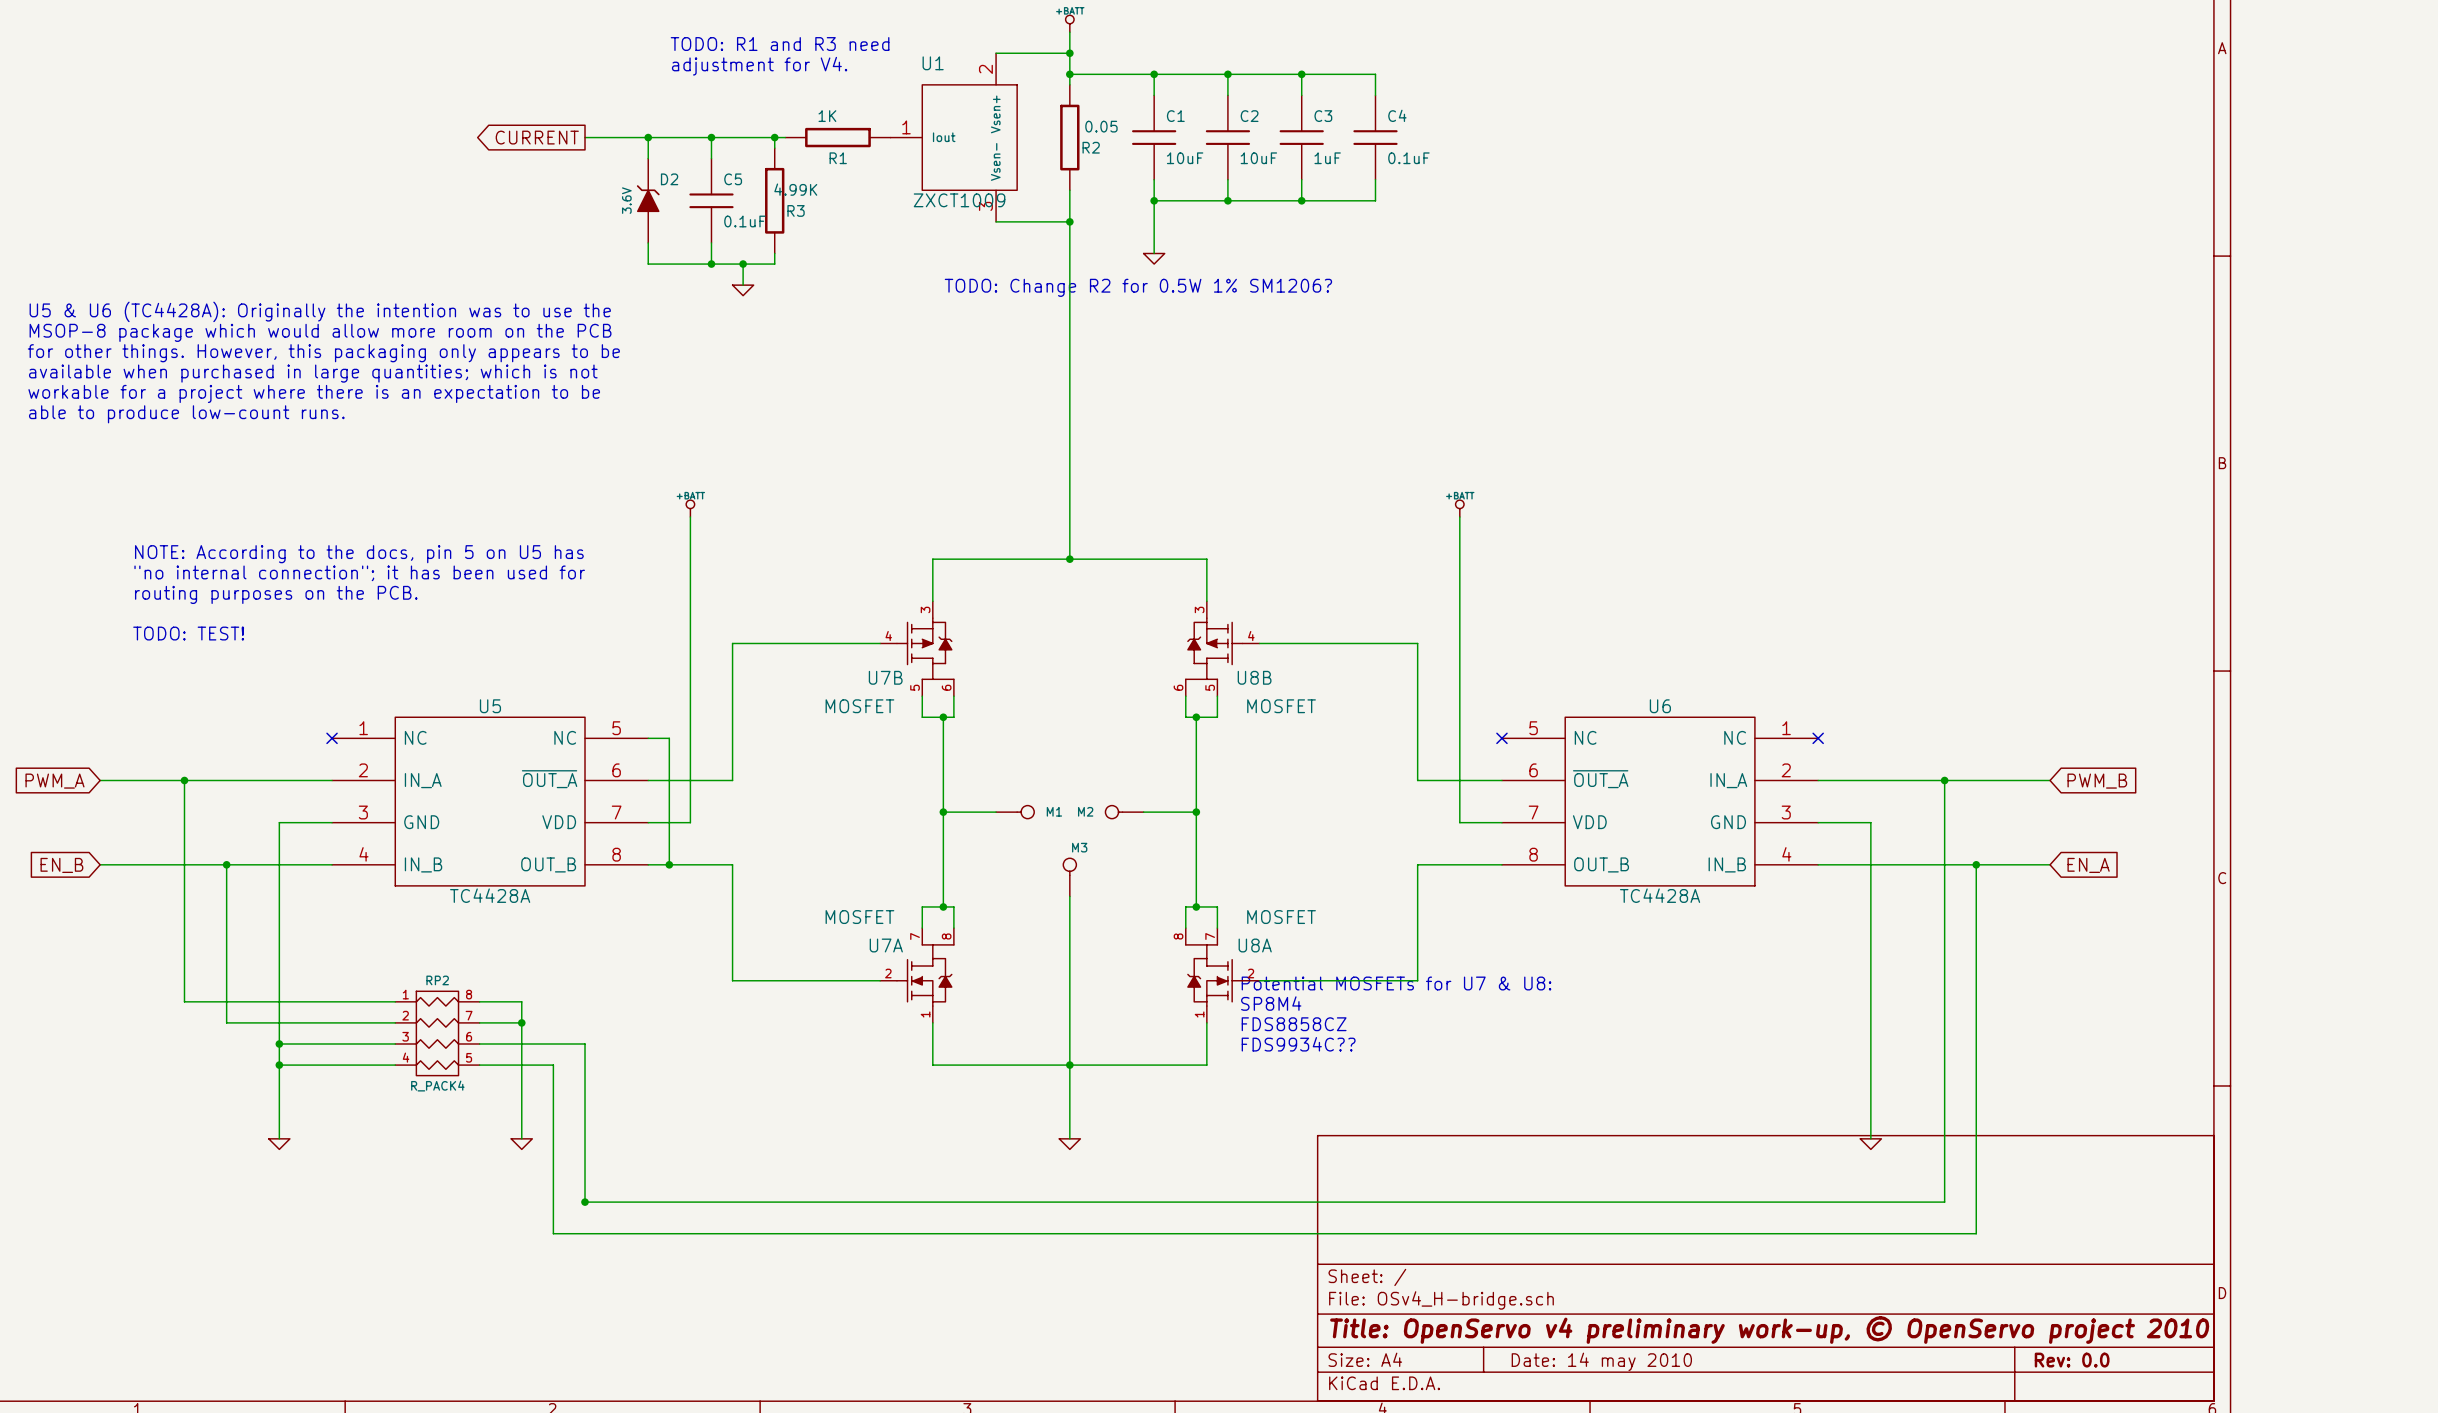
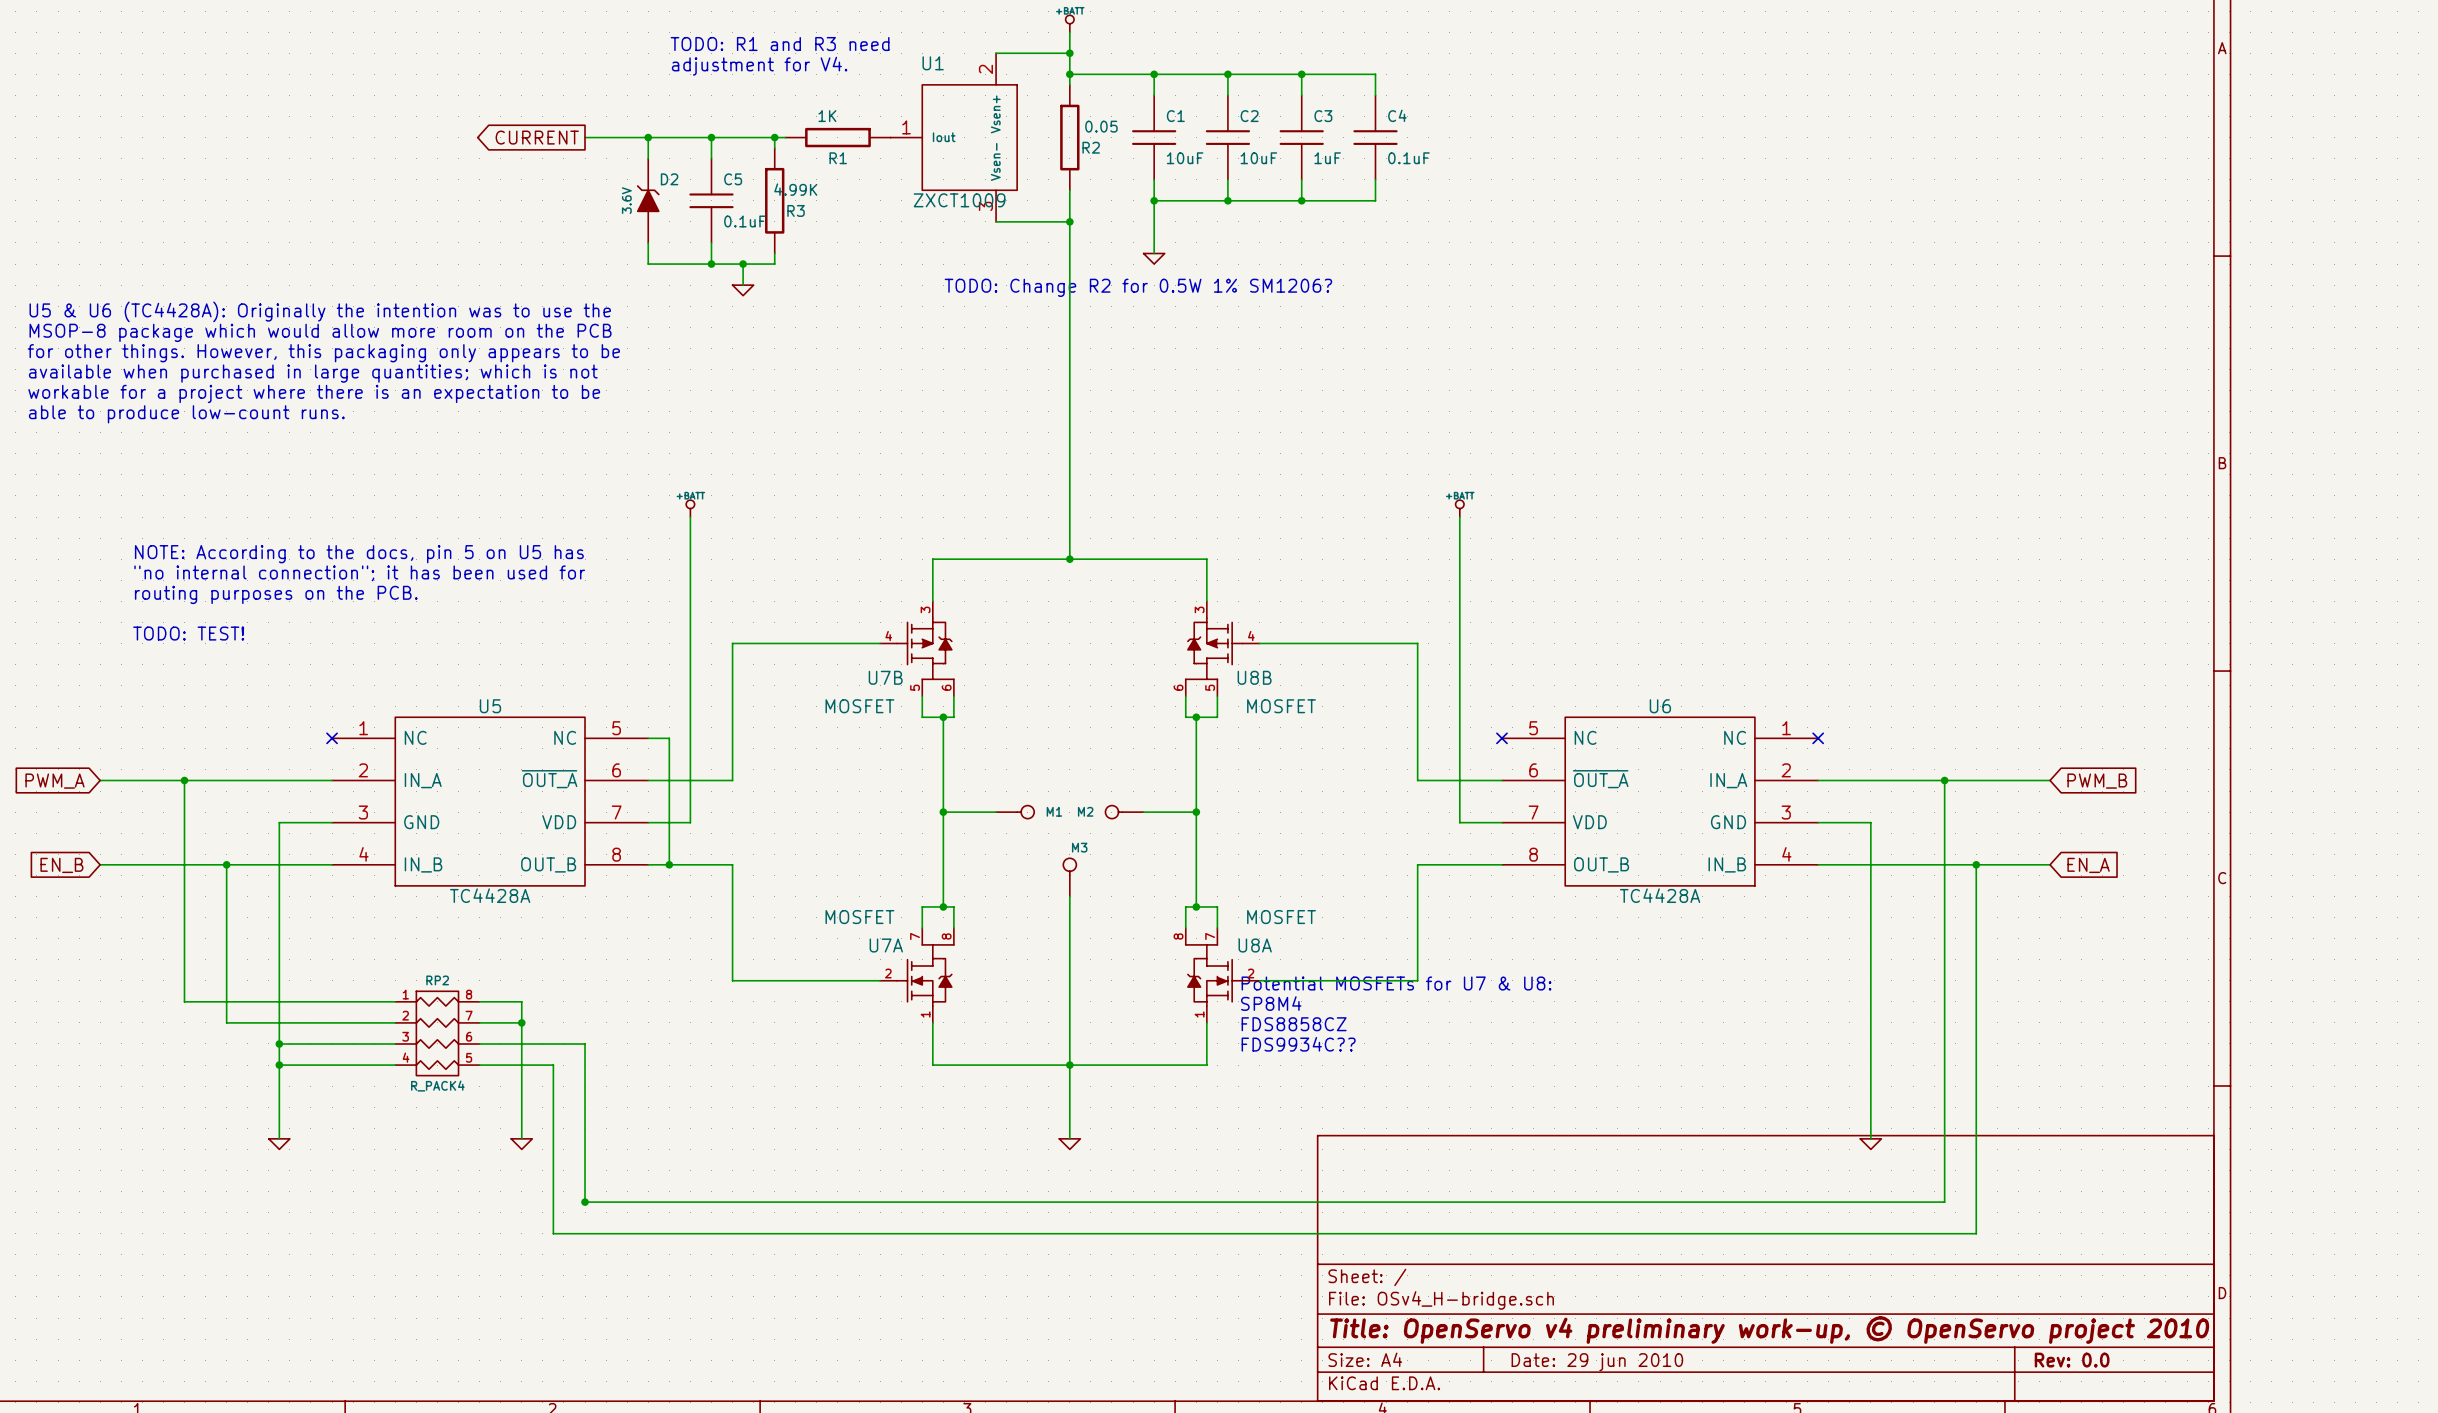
title block: Date: 14 may 2010 (1601, 1361) -> Date: 29 jun 2010 (1597, 1362)

